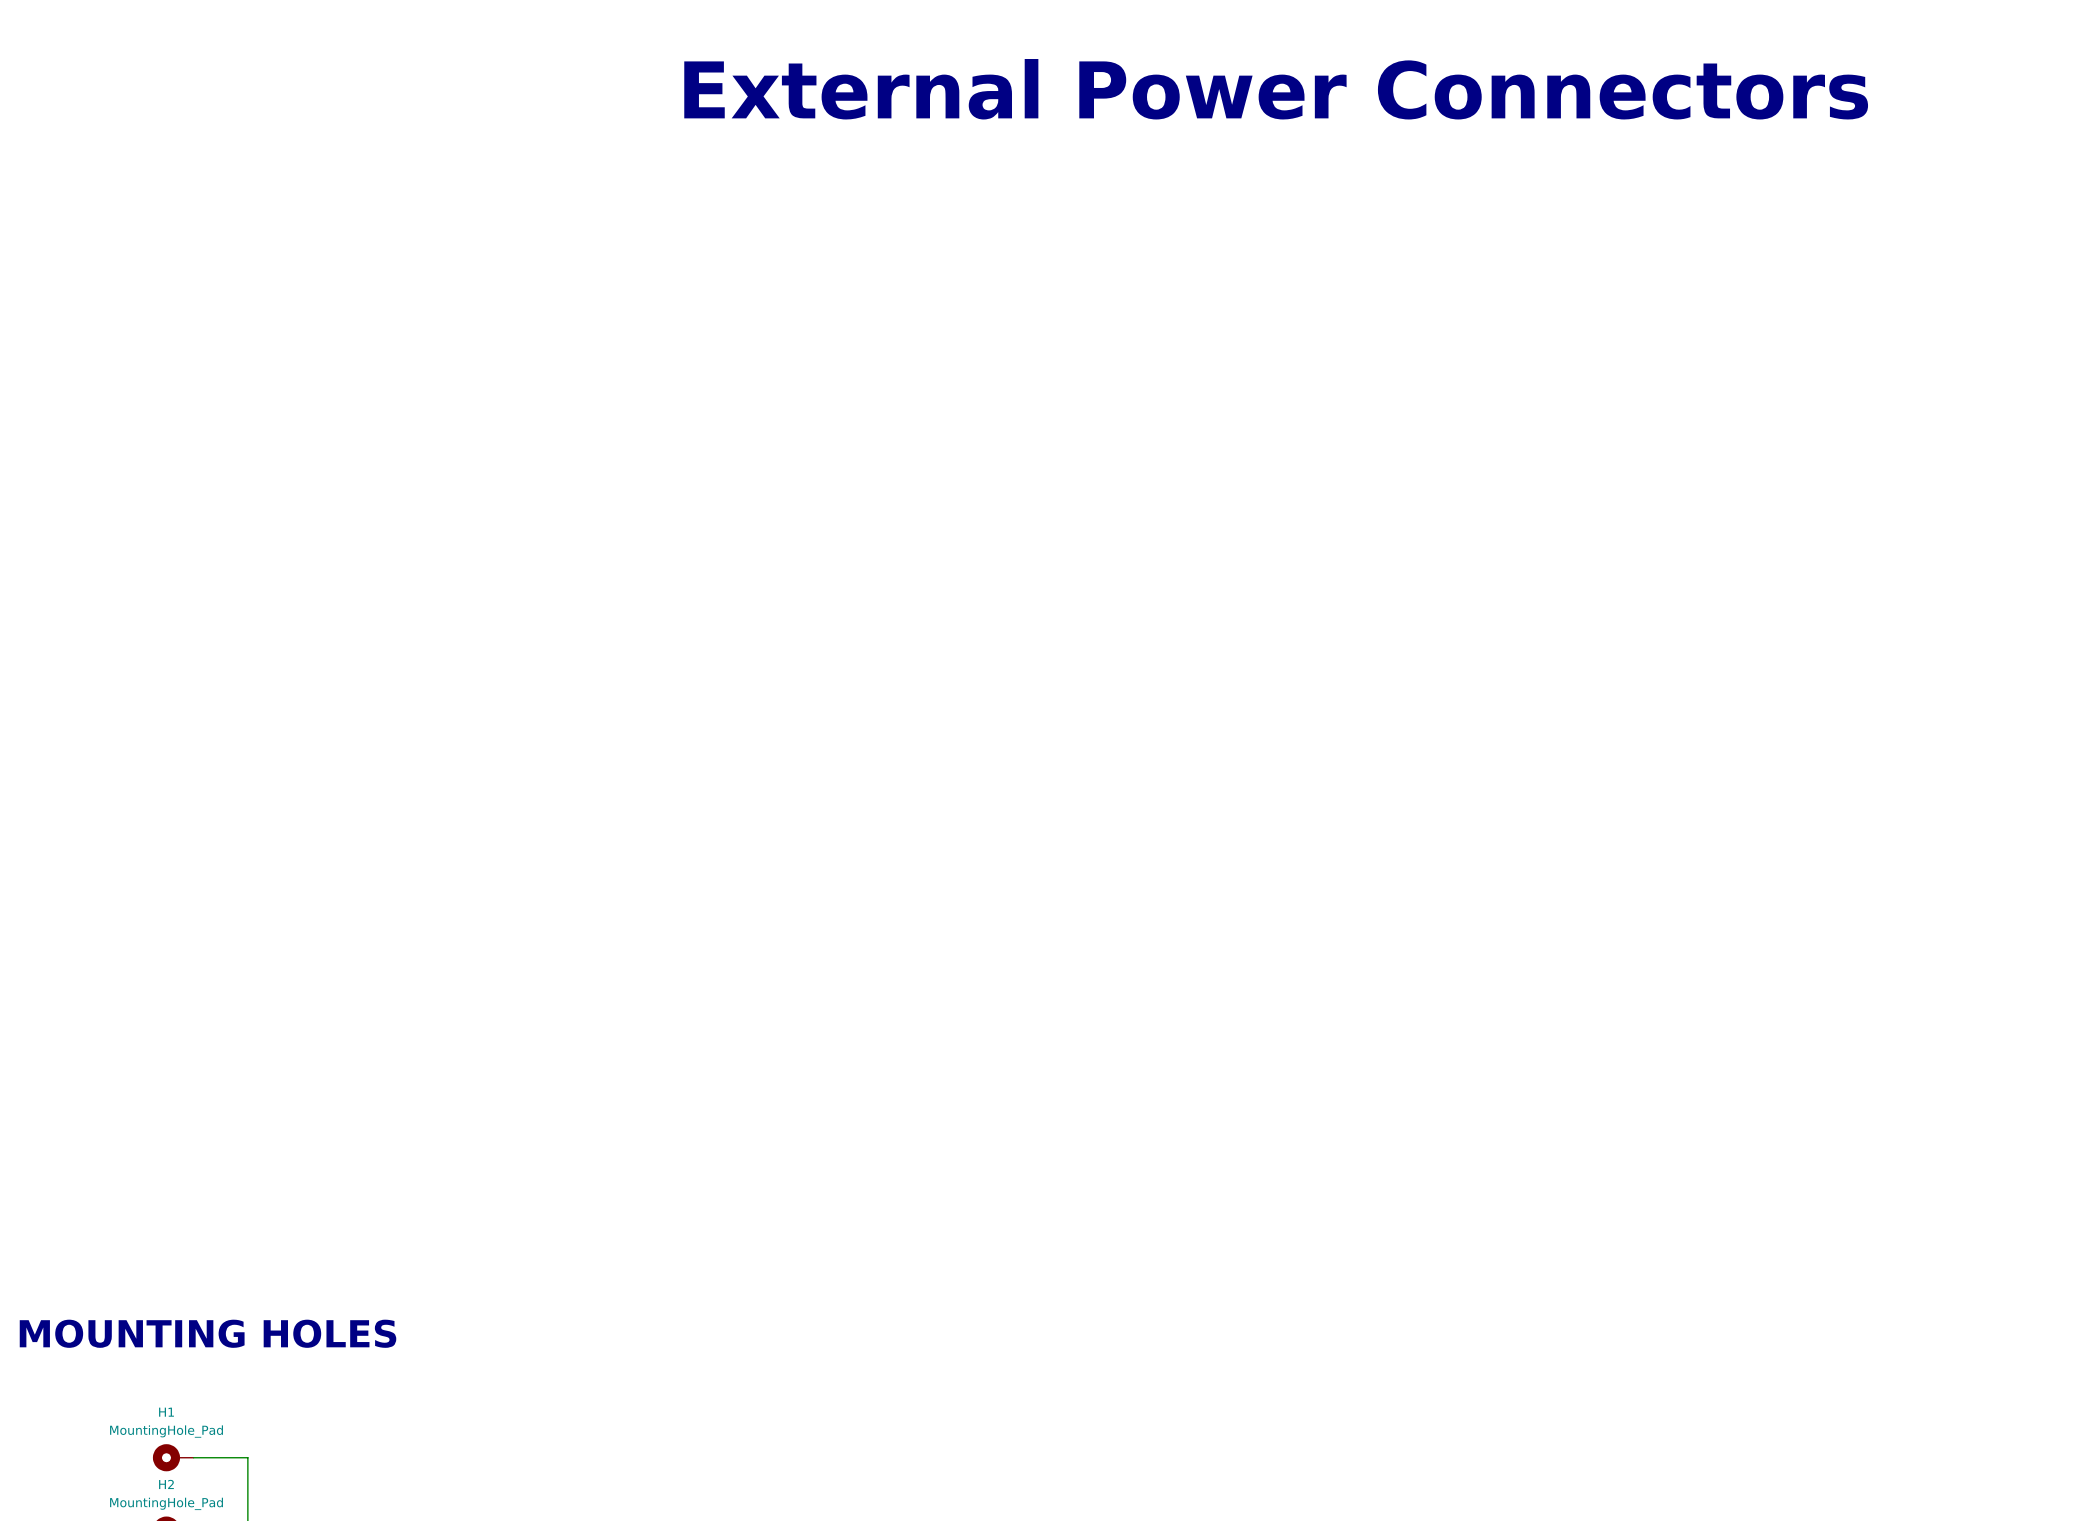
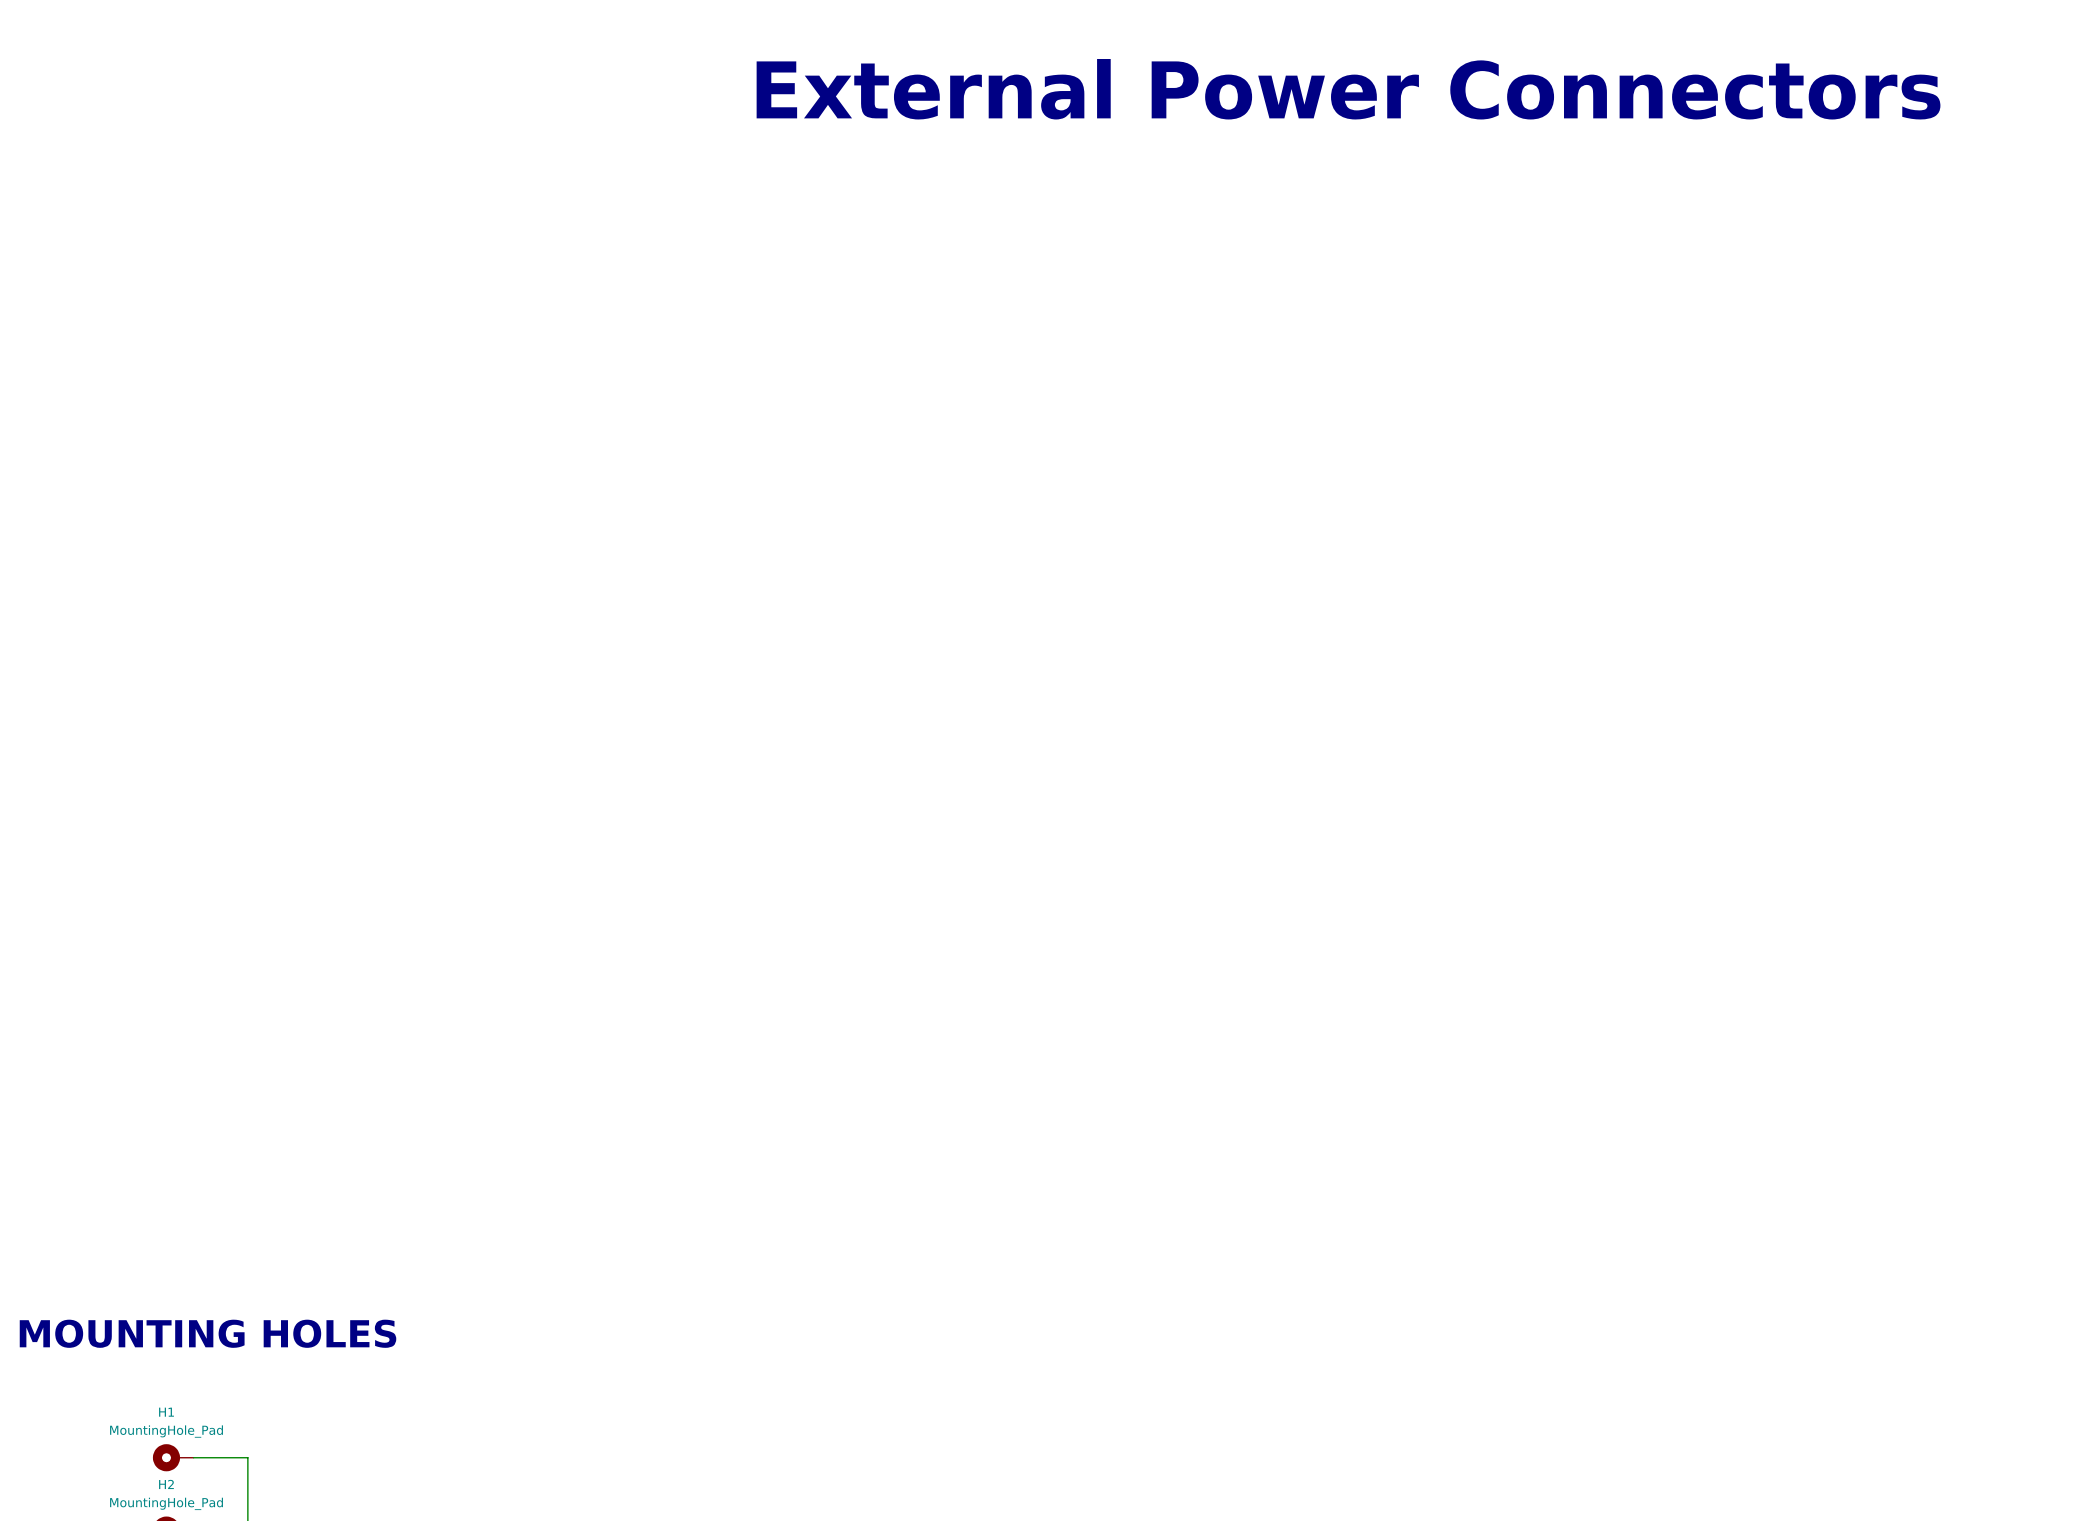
text position: External Power Connectors (1276, 89) -> External Power Connectors (1348, 89)

